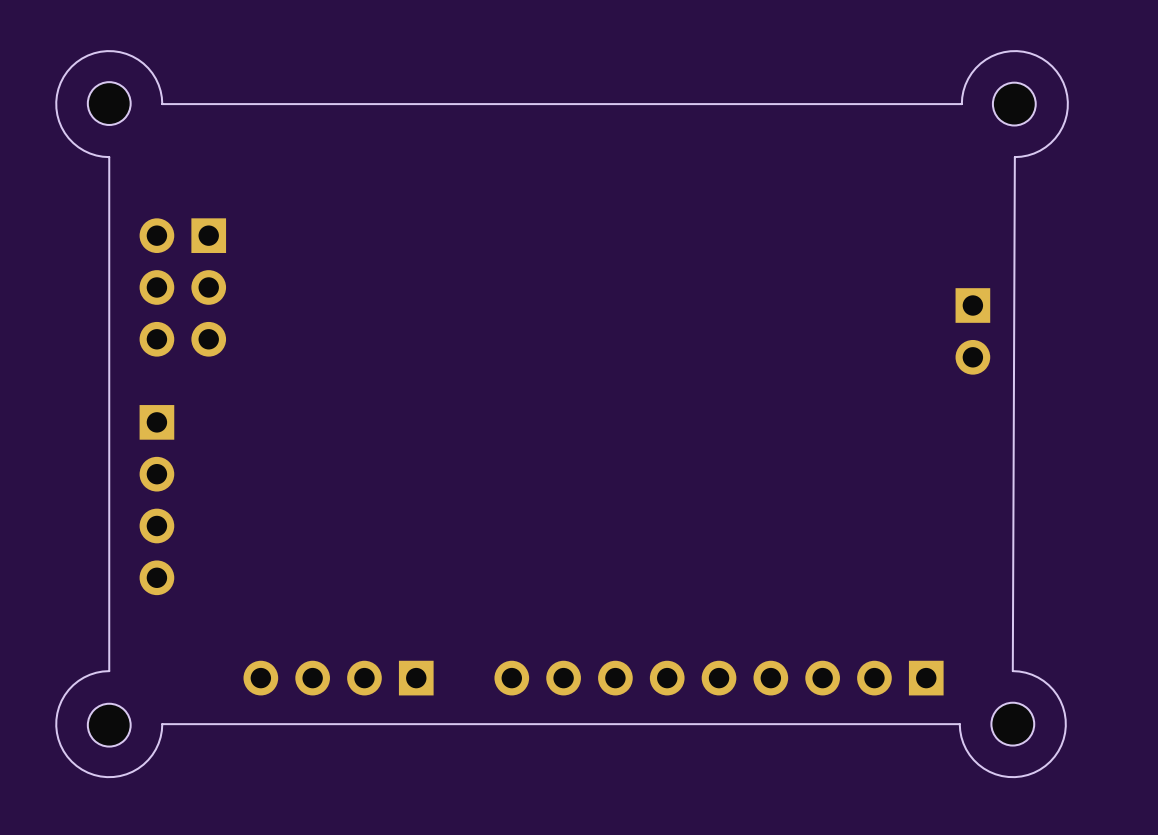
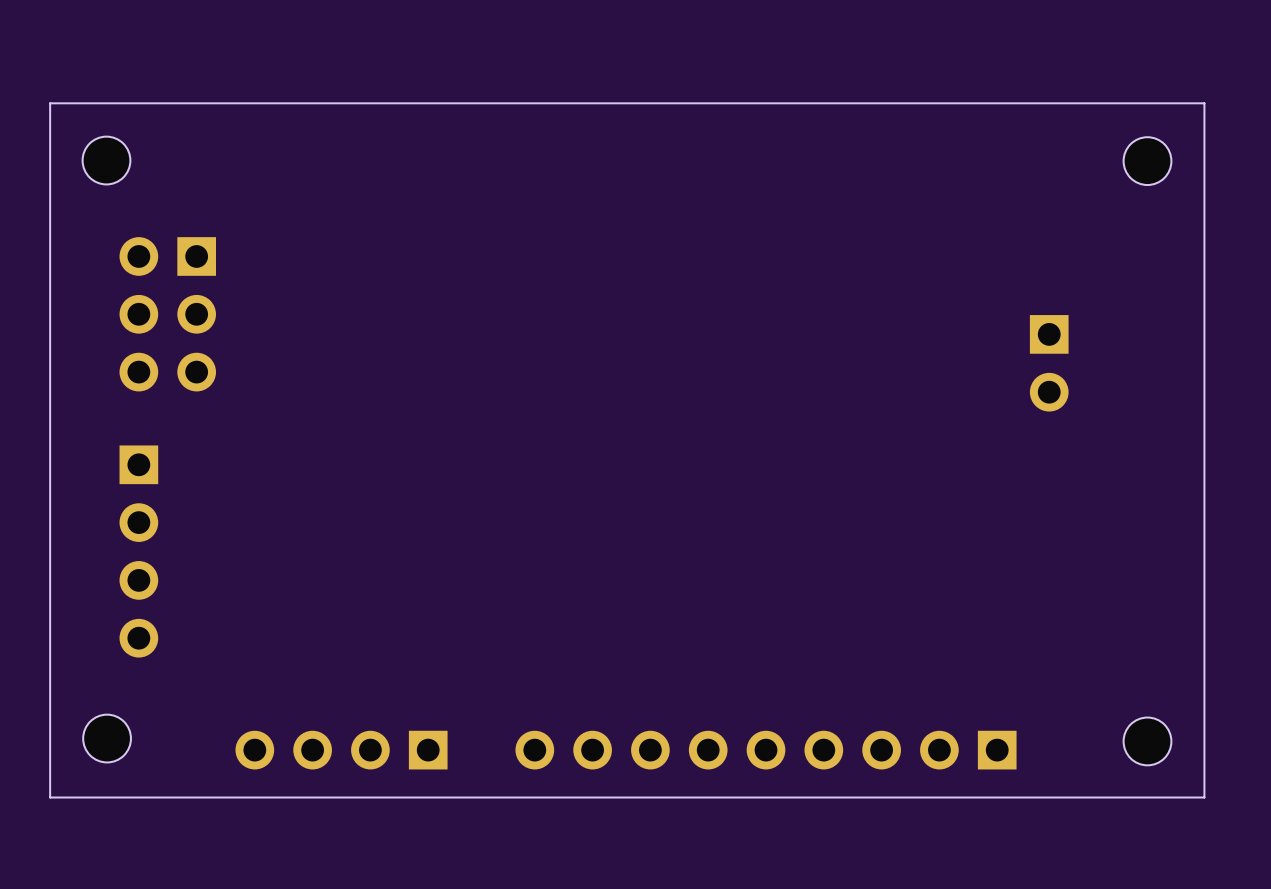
part position: (109, 103) -> (106, 160)
board edge: (961, 104) (162, 104) (160, 91) (152, 73) (143, 63) (132, 56) (113, 51) (100, 51) (87, 55) (76, 62) (63, 76) (58, 88) (56, 108) (59, 121) (68, 138) (78, 147) (96, 155) (109, 157) (109, 671) (96, 672) (78, 680) (68, 689) (61, 700) (56, 719) (56, 732) (60, 745) (67, 756) (82, 769) (94, 774) (113, 776) (126, 774) (138, 768) (152, 754) (158, 743) (162, 724) (959, 724) (961, 737) (966, 749) (973, 760) (989, 771) (1001, 776) (1015, 777) (1027, 774) (1045, 765) (1058, 751) (1063, 739) (1065, 726) (1062, 706) (1057, 695) (1043, 680) (1032, 674) (1012, 671) (1014, 157) (1027, 155) (1040, 150) (1055, 138) (1065, 121) (1067, 108) (1067, 95) (1060, 76) (1047, 62) (1029, 53) (1010, 51) (991, 56) (975, 68) (965, 84) (961, 104) -> (1204, 103) (1204, 797) (50, 797) (50, 103) (1204, 103)
part position: (1014, 104) -> (1147, 161)
part position: (1012, 724) -> (1147, 741)
part position: (109, 725) -> (107, 738)

